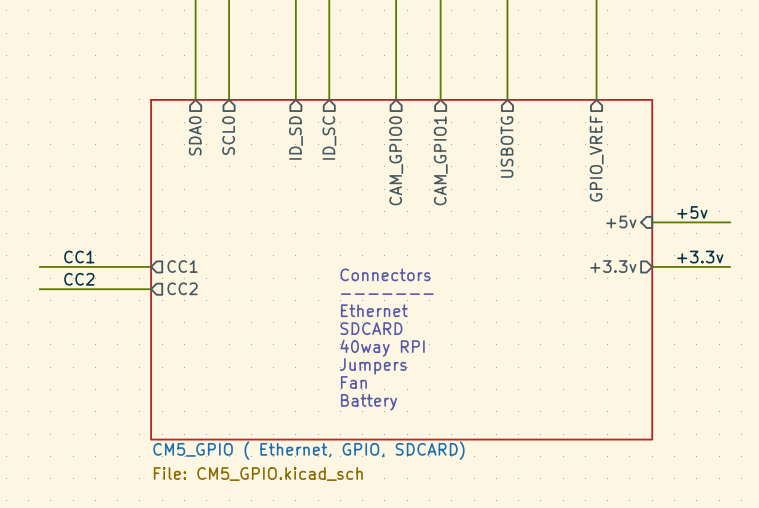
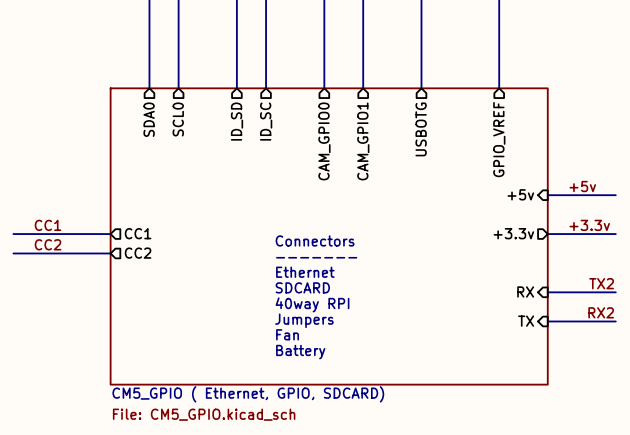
label: none -> TX2 (601, 283)
sheet pin: none -> RX (525, 291)
wire: none -> (547, 292) (615, 292)
label: none -> RX2 (601, 312)
sheet pin: none -> TX (526, 321)
wire: none -> (547, 321) (615, 321)

